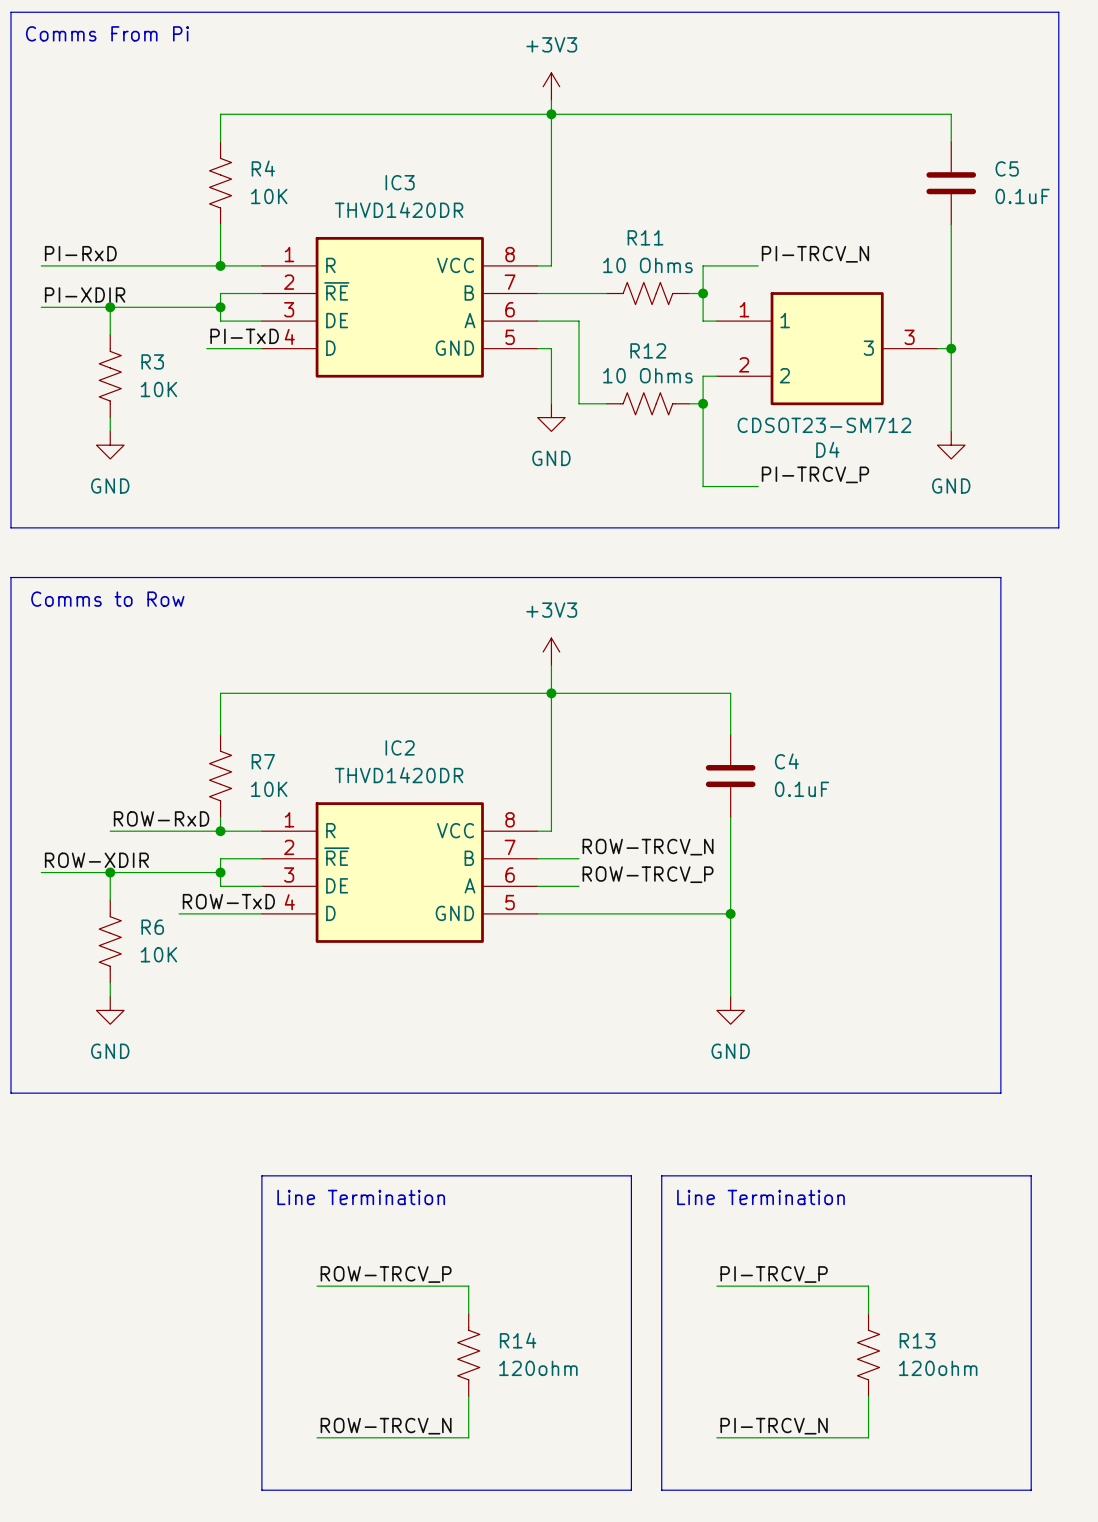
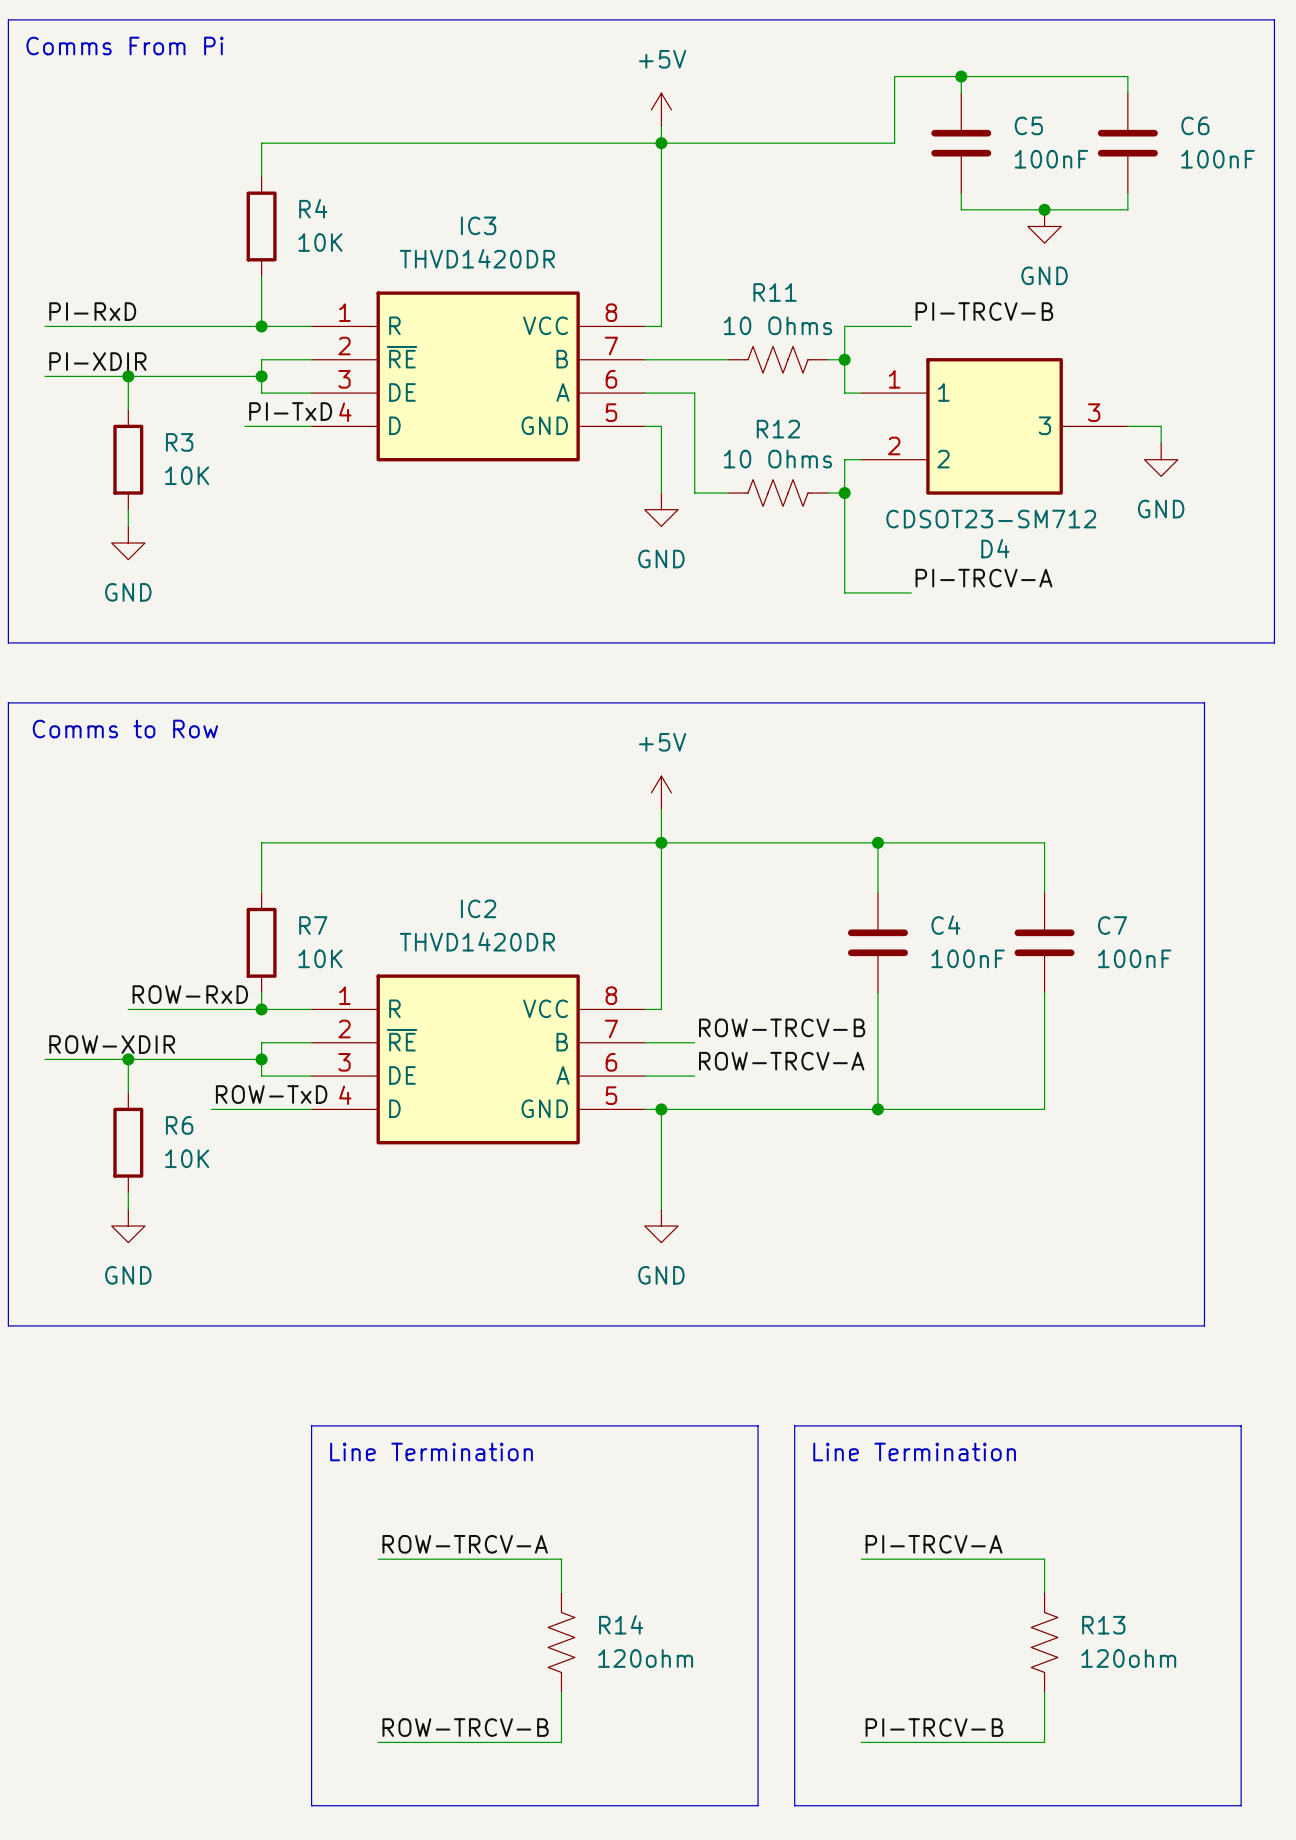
wire: none -> (961, 76) (961, 93)
junction: none -> (961, 76)
power symbol: +3V3 (551, 86) -> +5V (661, 109)
wire: (744, 114) (951, 114) (951, 141) -> (894, 143) (894, 76) (1127, 76) (1127, 93)
C6: none -> 100nF (1127, 143)
R4 symbol: [209, 141, 232, 225] -> [246, 176, 277, 277]
wire: none -> (961, 193) (961, 209) (1127, 209) (1127, 193)
junction: none -> (1044, 209)
power symbol: none -> GND (1044, 226)
C5 position: (951, 183) -> (961, 143)
C5 value: 0.1uF (1022, 196) -> 100nF (1051, 159)
wire: (951, 224) (951, 431) -> none
label: PI-TRCV_N (815, 254) -> PI-TRCV-B (984, 311)
R3 symbol: [99, 334, 122, 418] -> [113, 409, 144, 510]
wire: none -> (1144, 426) (1161, 426) (1161, 443)
junction: (951, 348) -> none
power symbol position: GND (951, 445) -> GND (1161, 459)
label: PI-TRCV_P (815, 474) -> PI-TRCV-A (984, 578)
power symbol: +3V3 (551, 651) -> +5V (661, 792)
wire: none -> (877, 842) (1044, 842) (1044, 892)
junction: none -> (877, 842)
R7 symbol: [209, 734, 232, 818] -> [246, 892, 277, 993]
C7: none -> 100nF (1044, 942)
C4 value: 0.1uF (801, 789) -> 100nF (968, 958)
label: ROW-TRCV_N (648, 847) -> ROW-TRCV-B (782, 1027)
label: ROW-TRCV_P (648, 874) -> ROW-TRCV-A (781, 1061)
R6 symbol: [99, 900, 122, 983] -> [113, 1092, 144, 1193]
wire: none -> (661, 1109) (661, 1209)
junction: none -> (661, 1109)
wire: (730, 913) (730, 996) -> (877, 1109) (1044, 1109) (1044, 992)
power symbol position: GND (730, 1010) -> GND (661, 1226)
label: ROW-TRCV_P (386, 1274) -> ROW-TRCV-A (465, 1544)
label: PI-TRCV_P (774, 1274) -> PI-TRCV-A (934, 1544)
label: ROW-TRCV_N (386, 1426) -> ROW-TRCV-B (465, 1727)
label: PI-TRCV_N (774, 1426) -> PI-TRCV-B (934, 1727)

